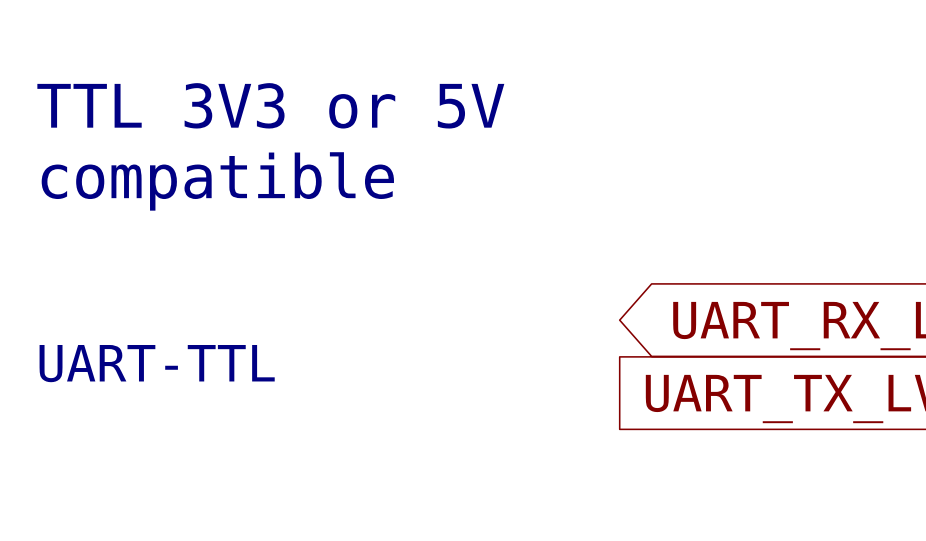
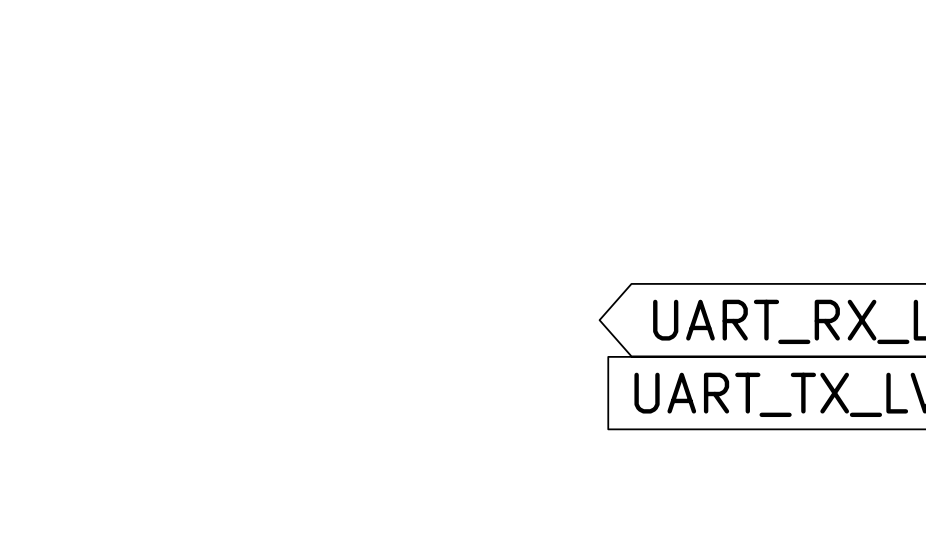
text: TTL 3V3 or 5V (270, 105) -> none
text: compatible (217, 181) -> none
text: UART-TTL (157, 363) -> none

